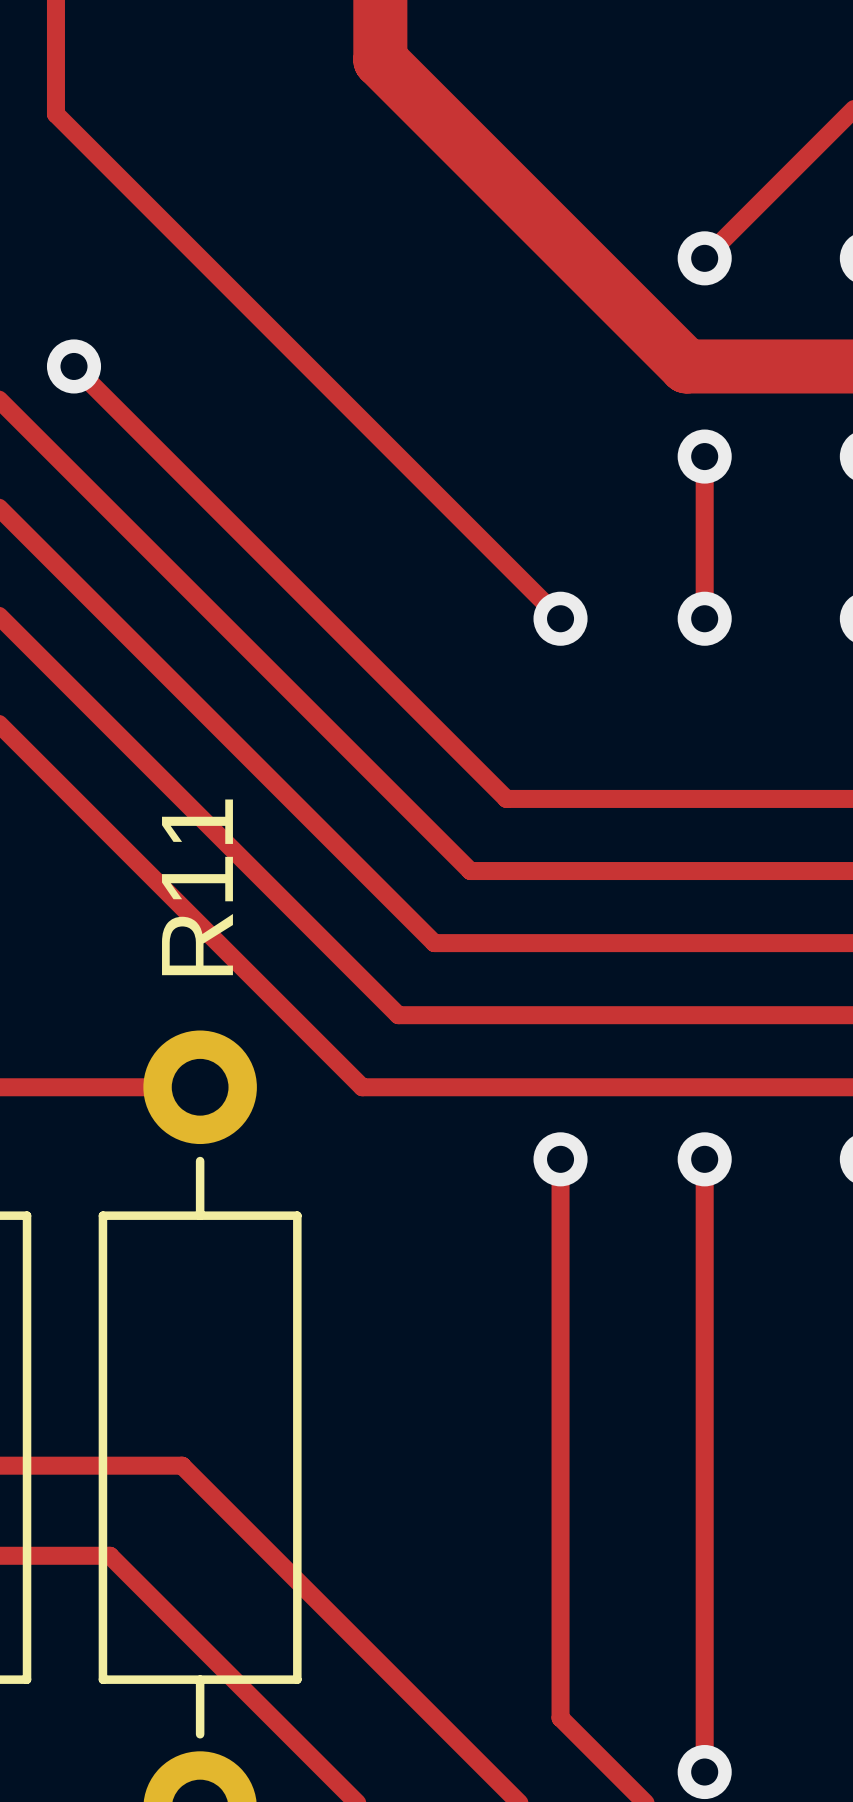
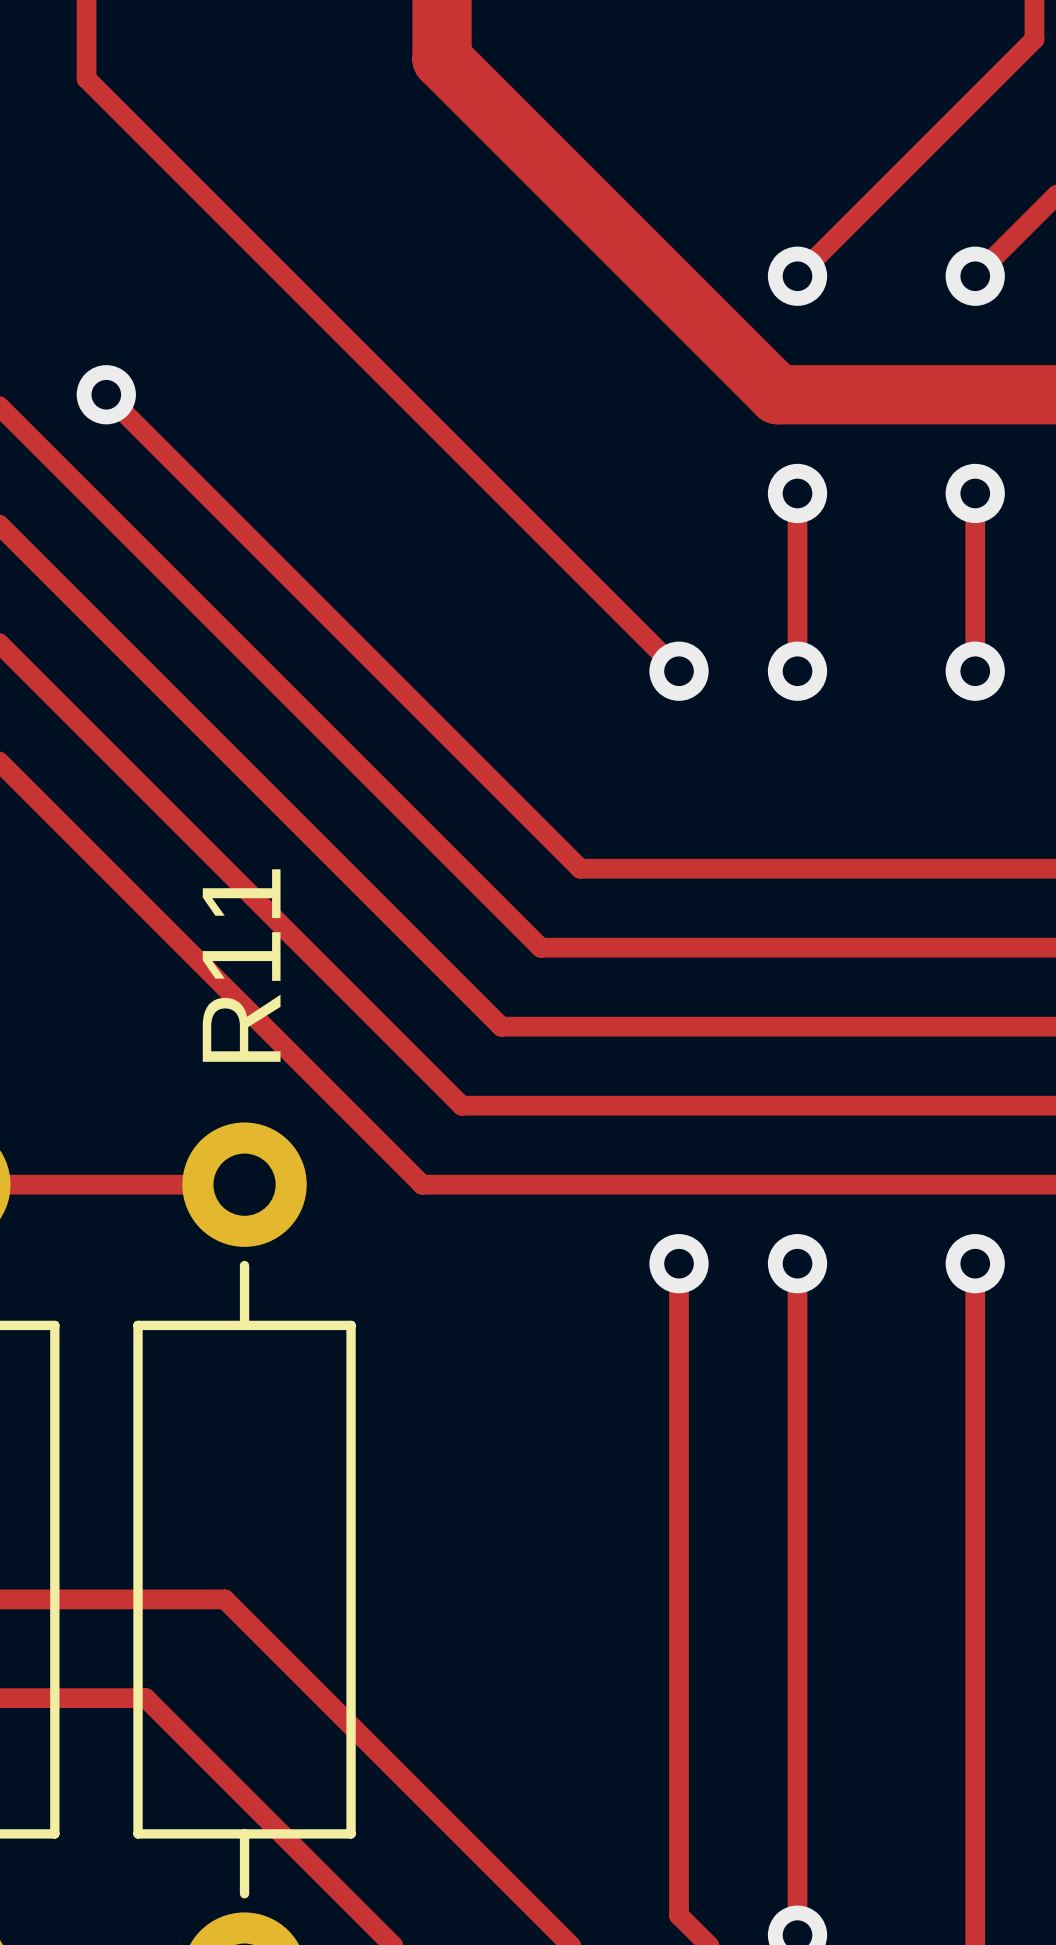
track: (55, 78) (55, 114) (560, 618) -> (86, 78) (679, 671)
via position: (560, 618) -> (679, 671)
track: (560, 1159) (560, 1717) (596, 1754) -> (679, 1263) (679, 1915)
via position: (560, 1159) -> (679, 1263)

